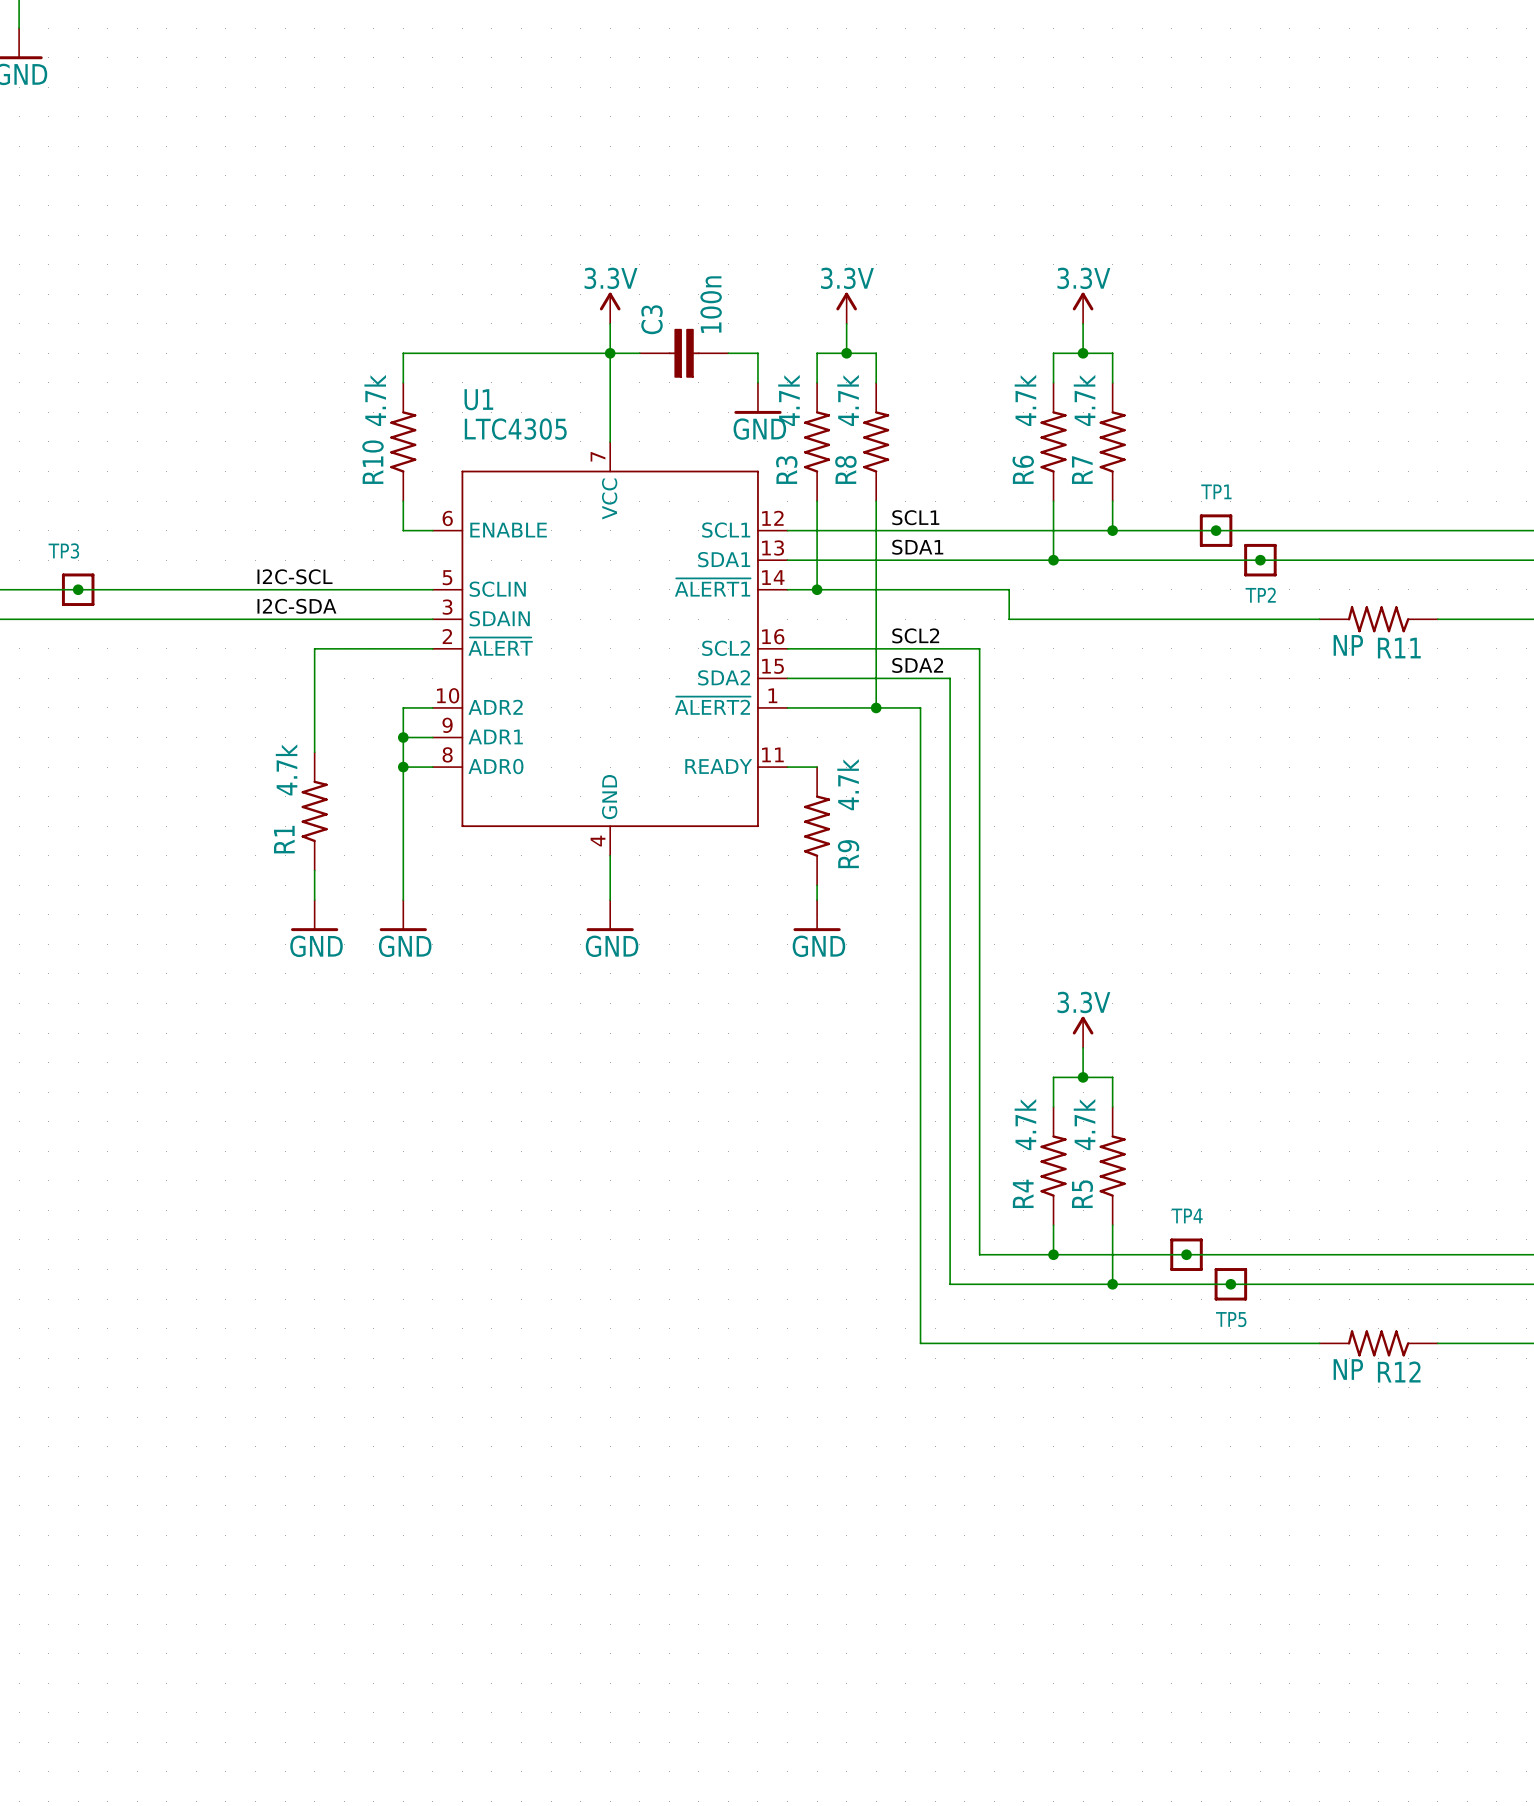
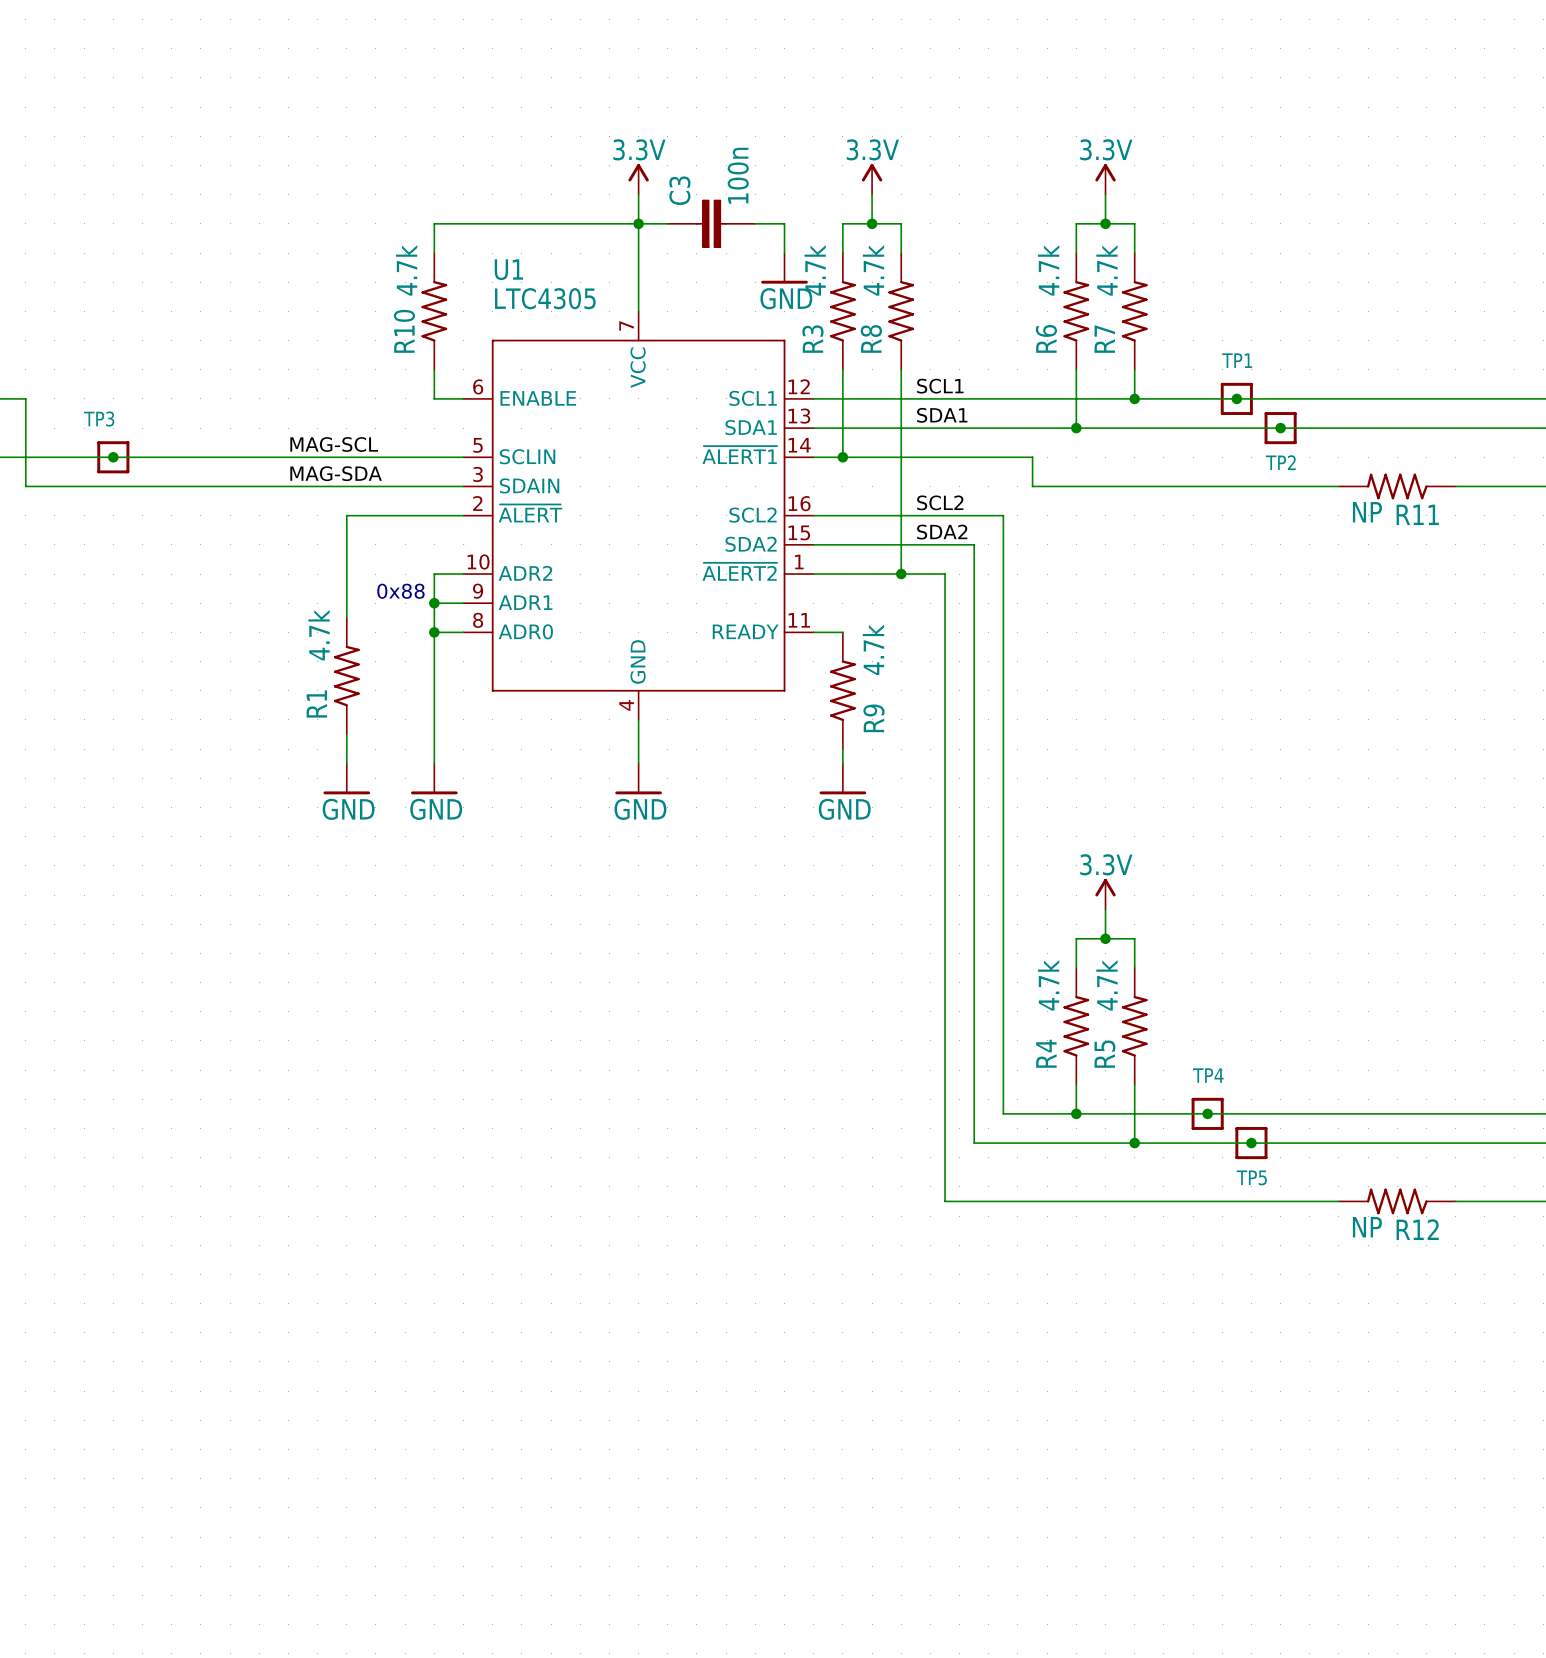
label: I2C-SCL (294, 576) -> MAG-SCL (334, 444)
label: I2C-SDA (296, 606) -> MAG-SDA (336, 473)
text: none -> 0x88 (400, 591)

